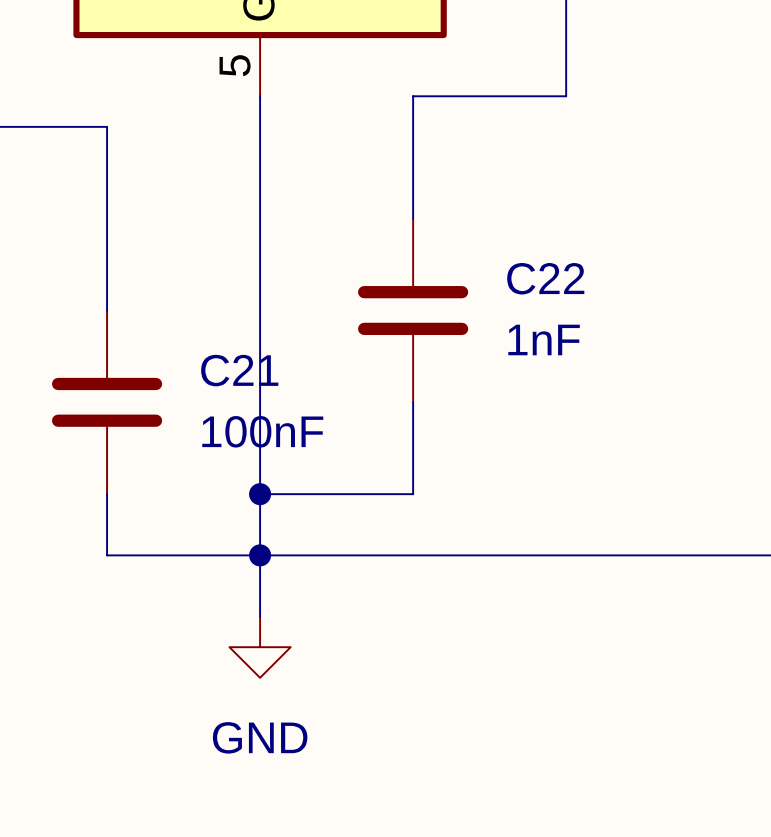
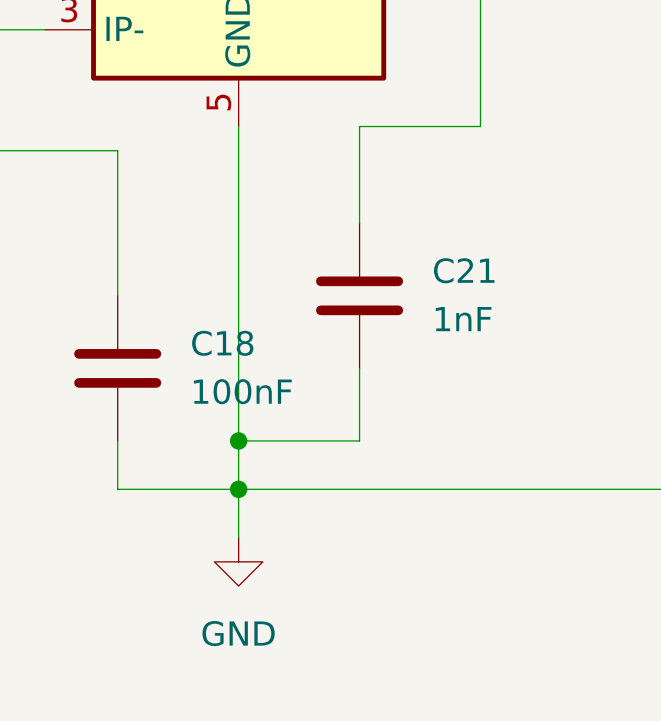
C22 name: C22 (545, 278) -> C21 (464, 270)
C21 name: C21 (239, 370) -> C18 (222, 343)

